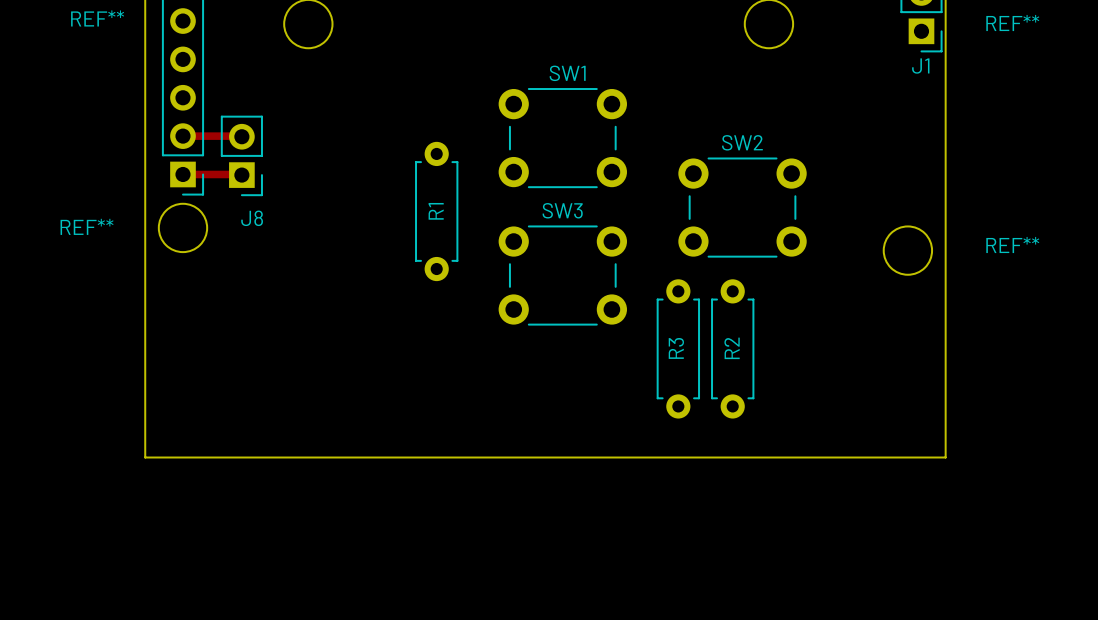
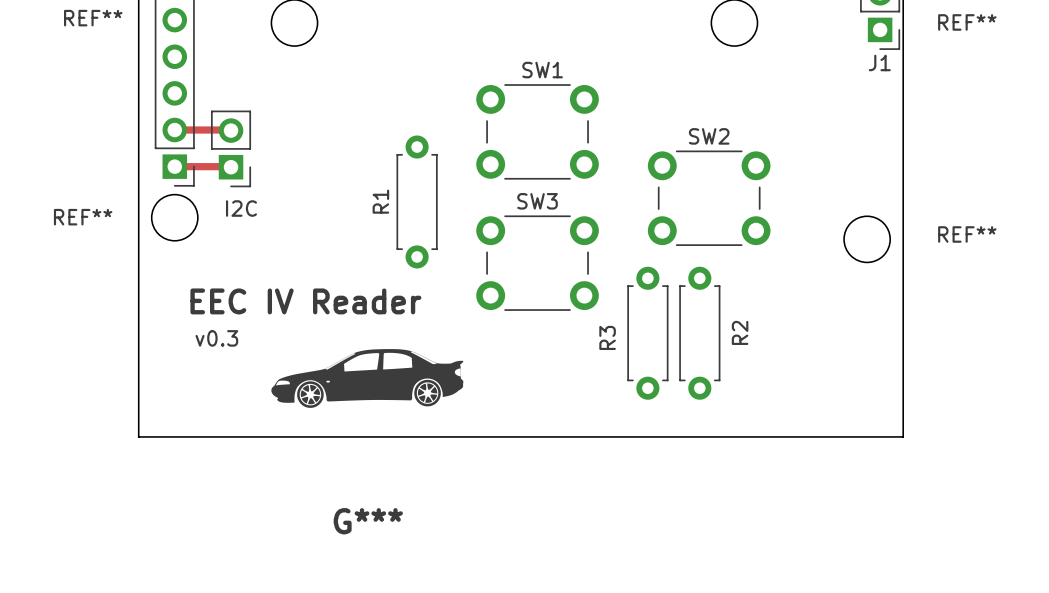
R1 name position: R1 (436, 211) -> R1 (380, 201)
J8 name: J8 (252, 218) -> I2C (241, 208)
text: none -> EEC IV Reader (305, 301)
R3 name position: R3 (676, 348) -> R3 (607, 337)
R2 name position: R2 (732, 348) -> R2 (740, 332)
text: none -> v0.3 (216, 338)
G***: none -> (367, 378)

